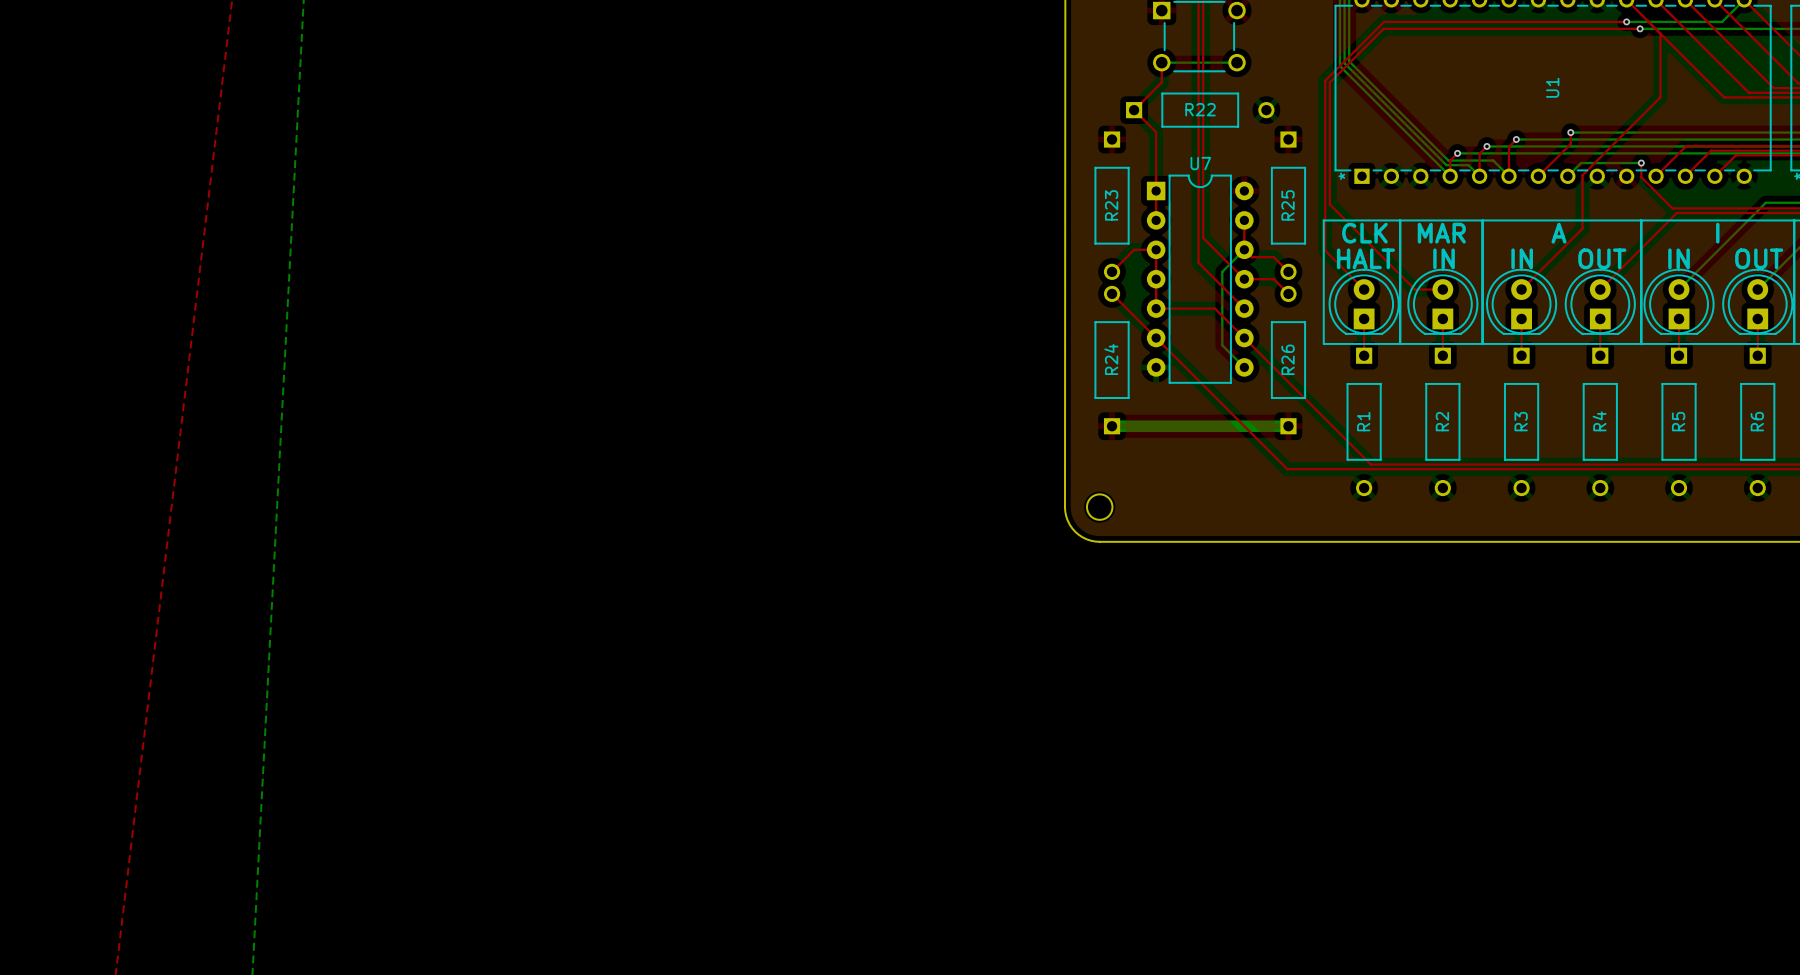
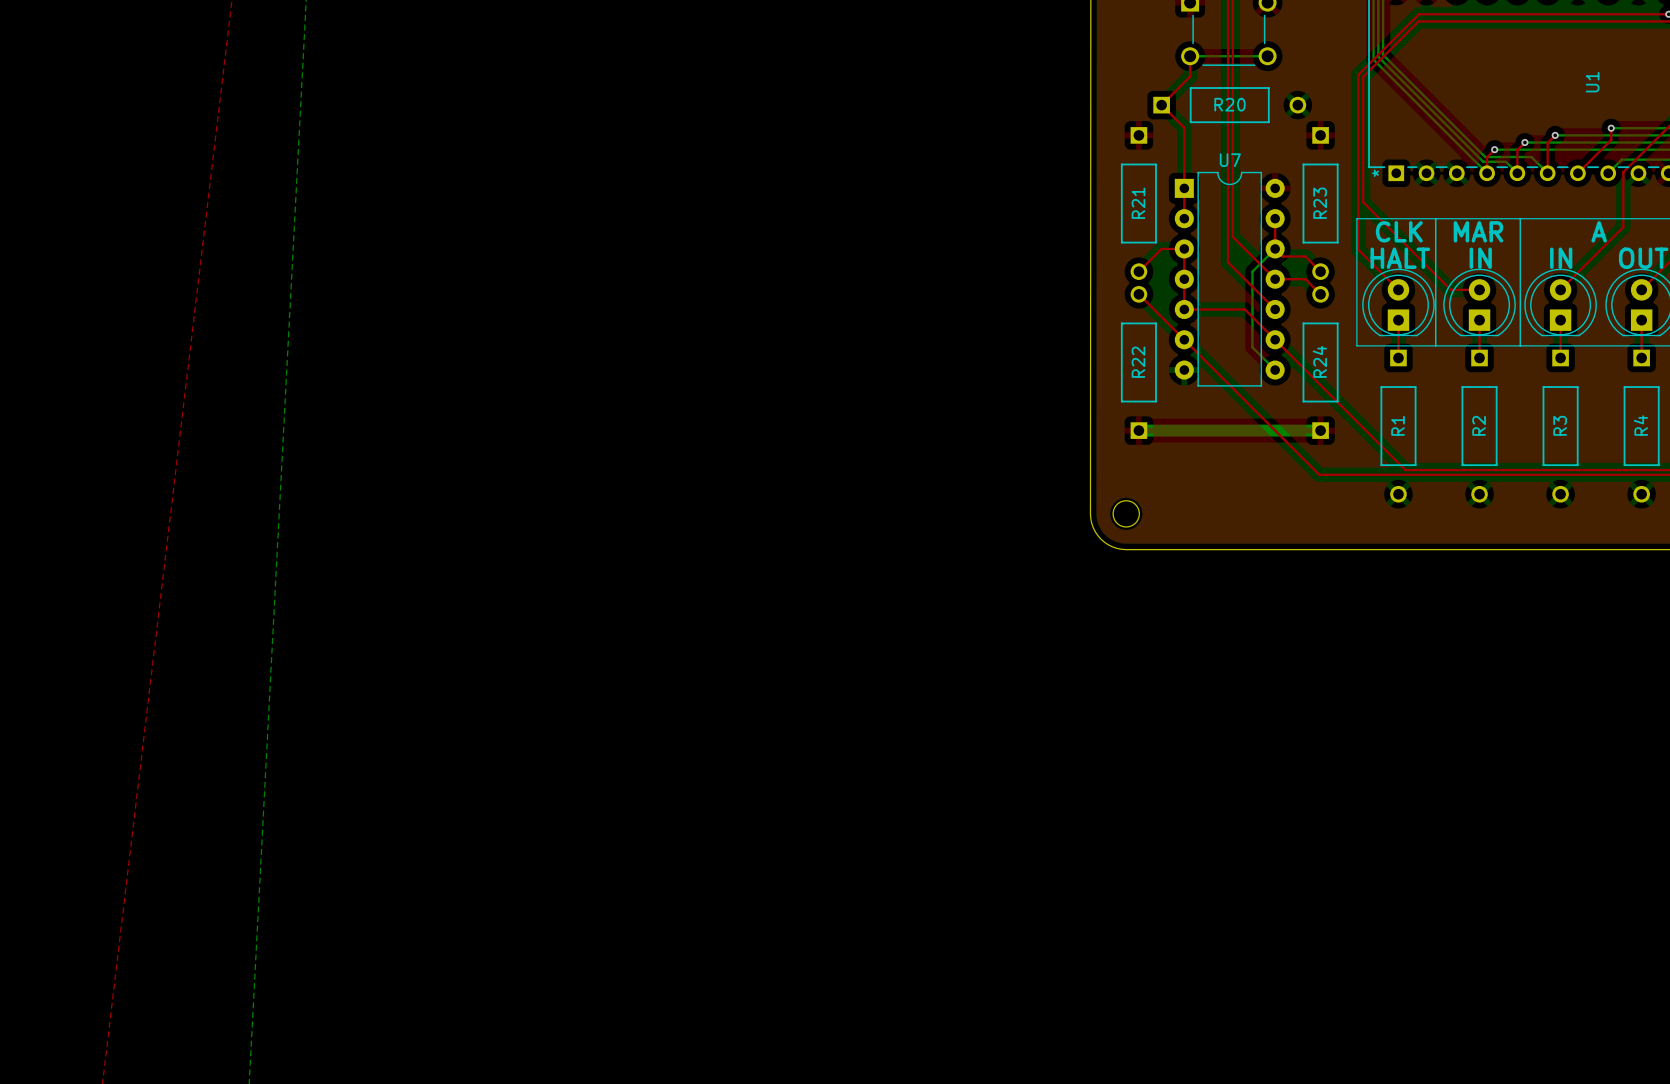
R22 name: R22 (1200, 109) -> R20 (1230, 104)
R23 name: R23 (1111, 205) -> R21 (1138, 203)
R25 name: R25 (1288, 205) -> R23 (1320, 203)
R24 name: R24 (1111, 359) -> R22 (1138, 362)
R26 name: R26 (1288, 359) -> R24 (1319, 361)

